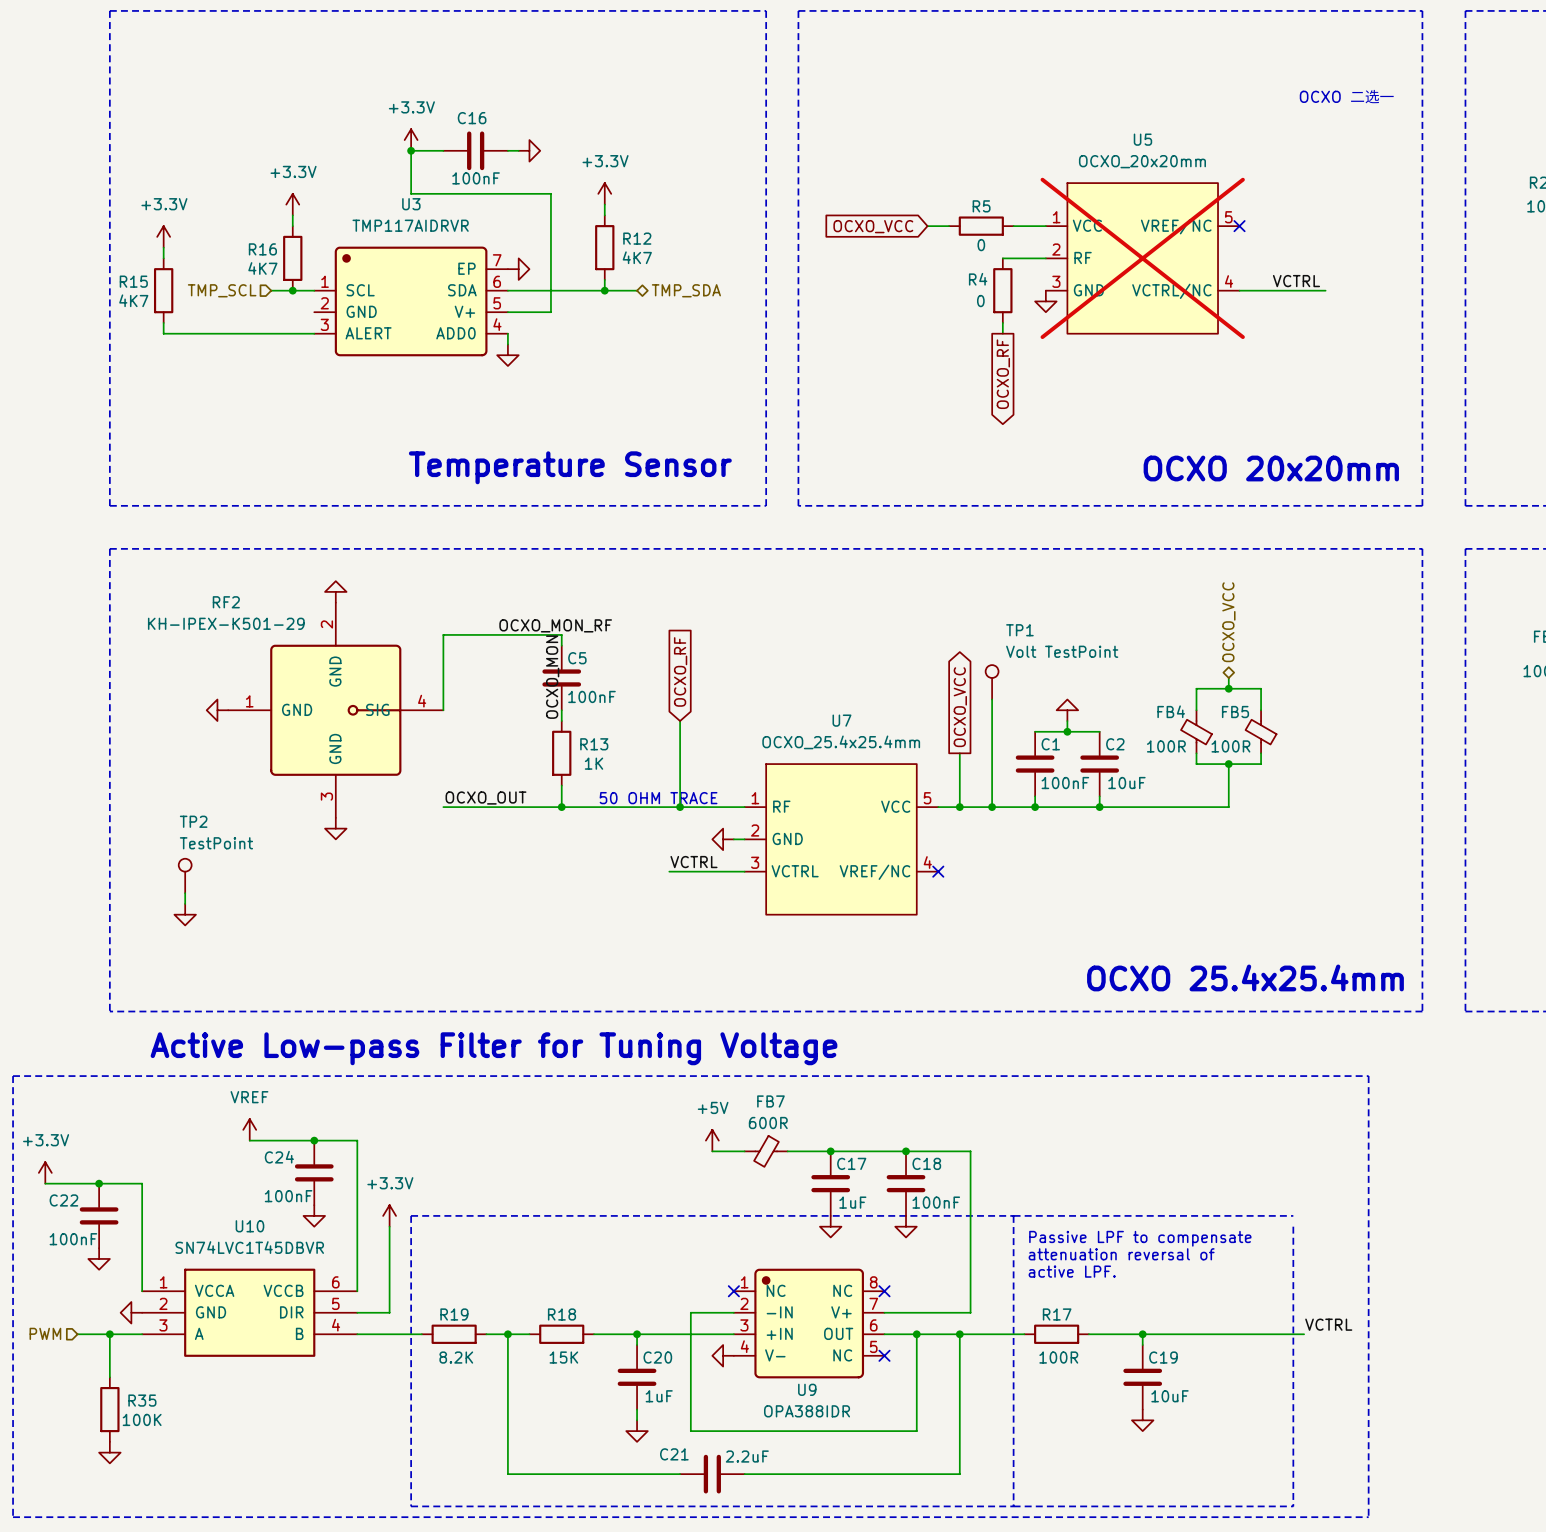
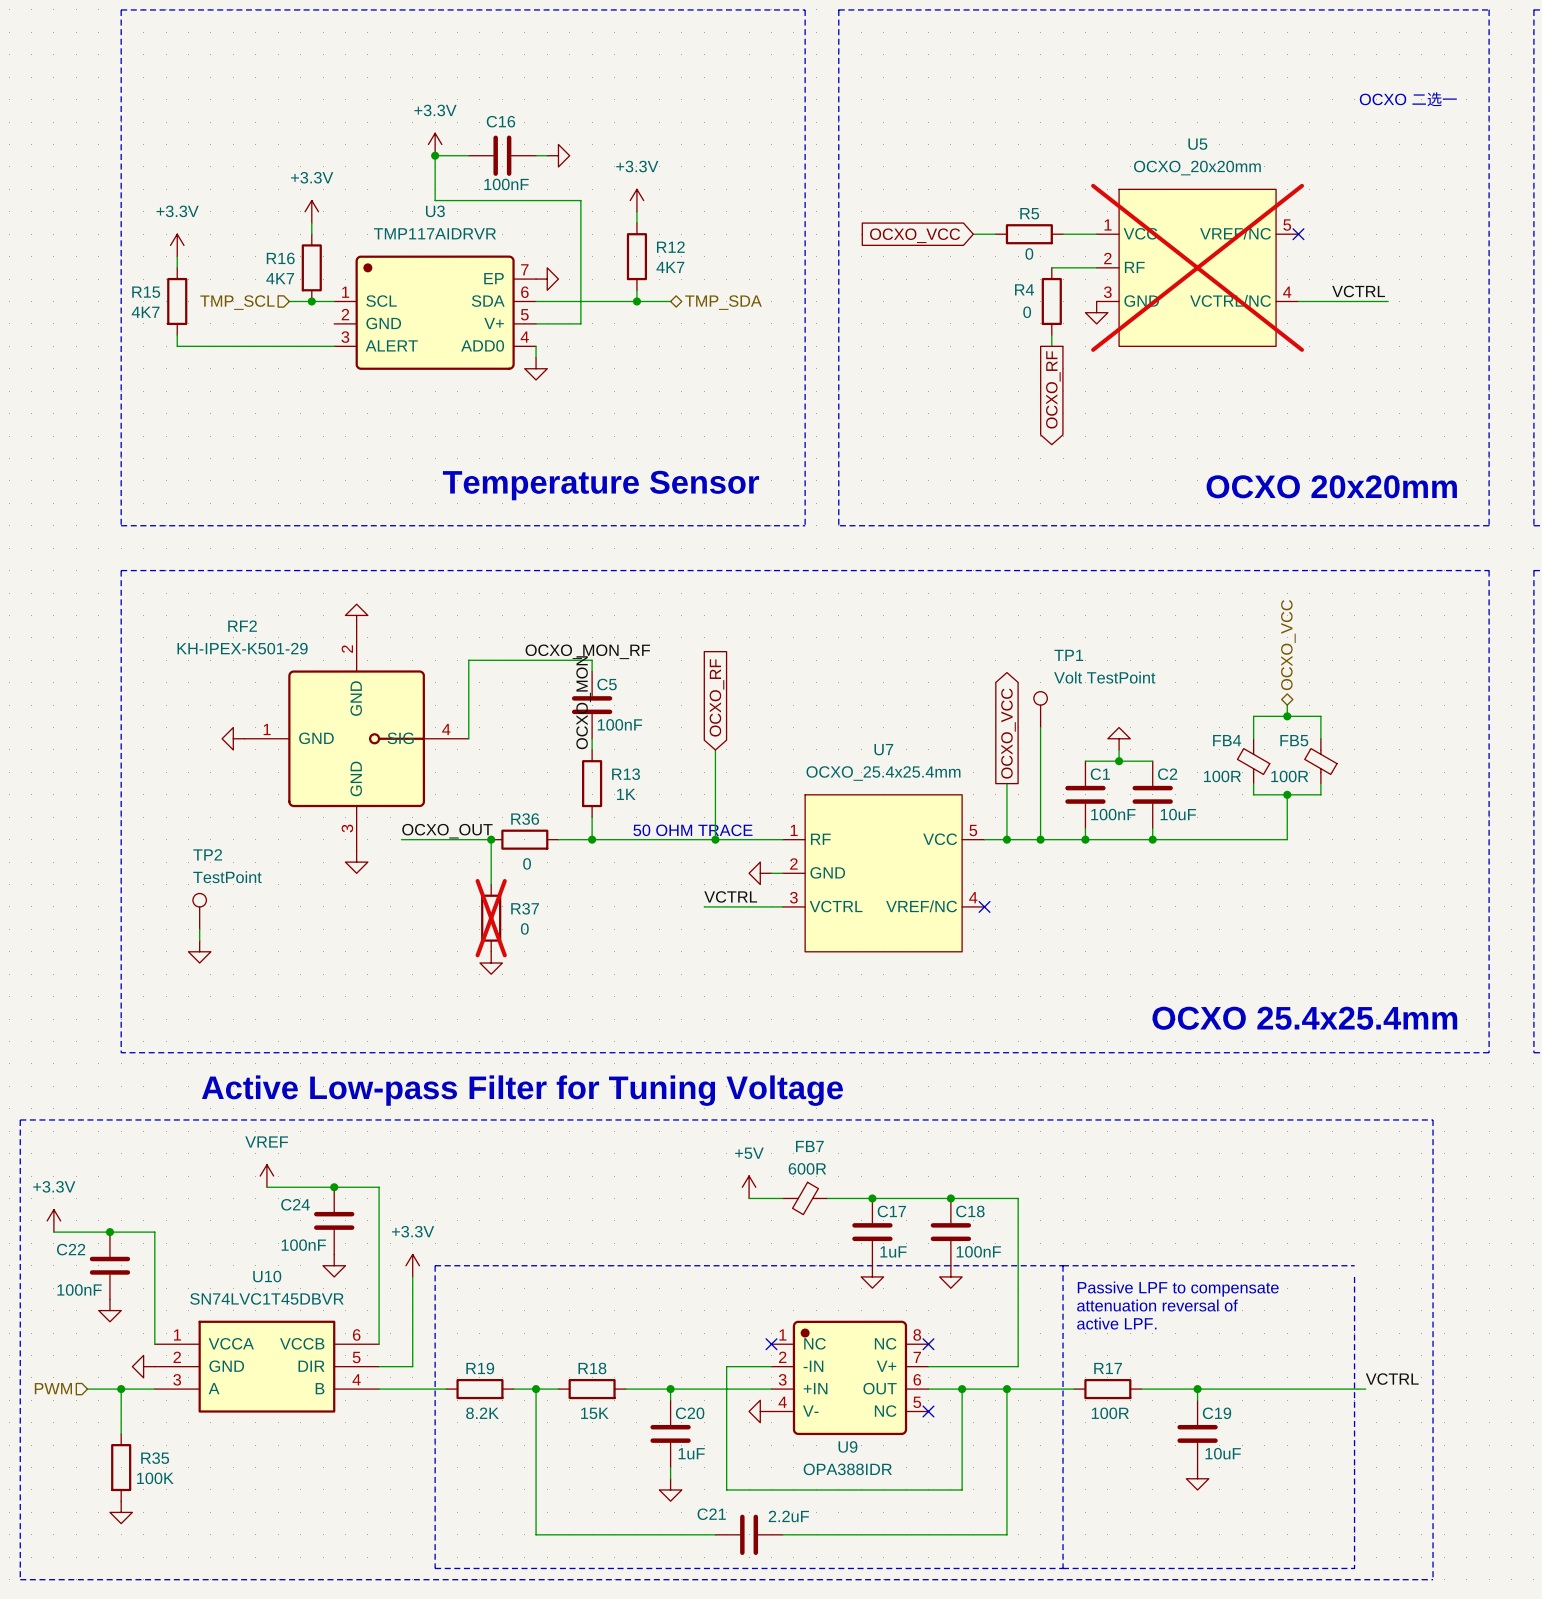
label position: OCXO_OUT (485, 798) -> OCXO_OUT (447, 831)
wire: none -> (401, 839) (468, 839)
wire: (464, 807) (529, 807) -> (491, 839) (491, 884)
junction: none -> (491, 839)
R36: none -> 0 (524, 839)
R37: none -> 0 (491, 918)
power symbol: none -> (491, 963)

